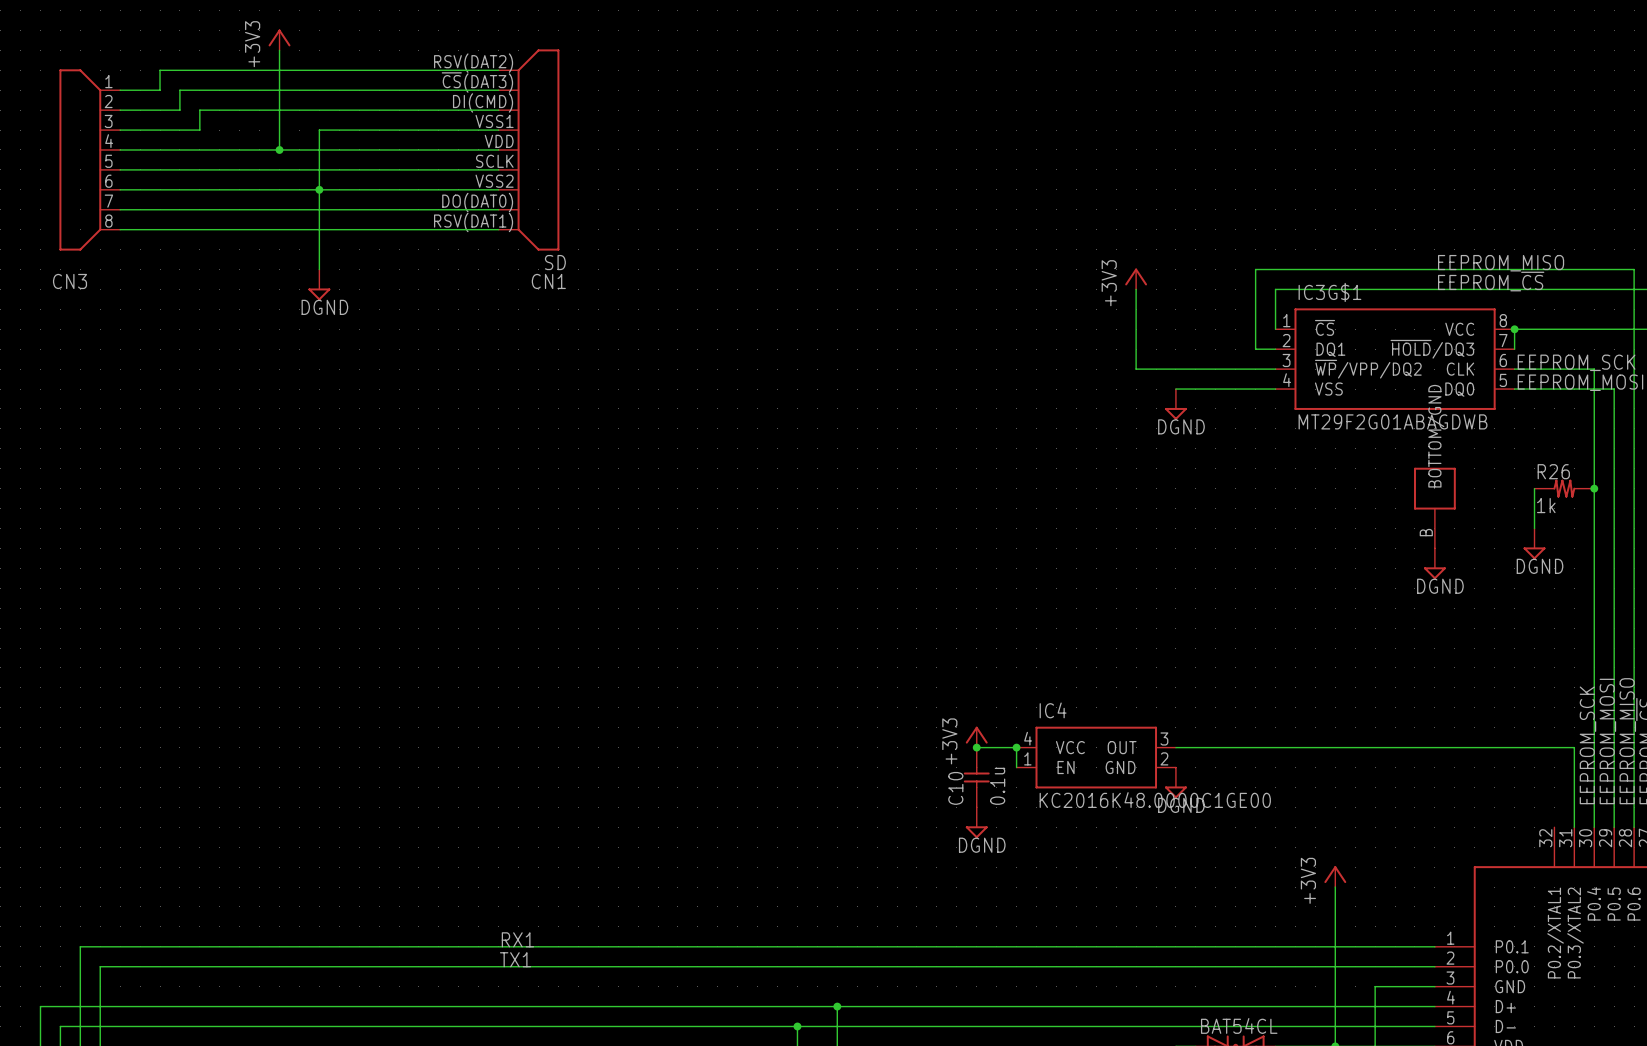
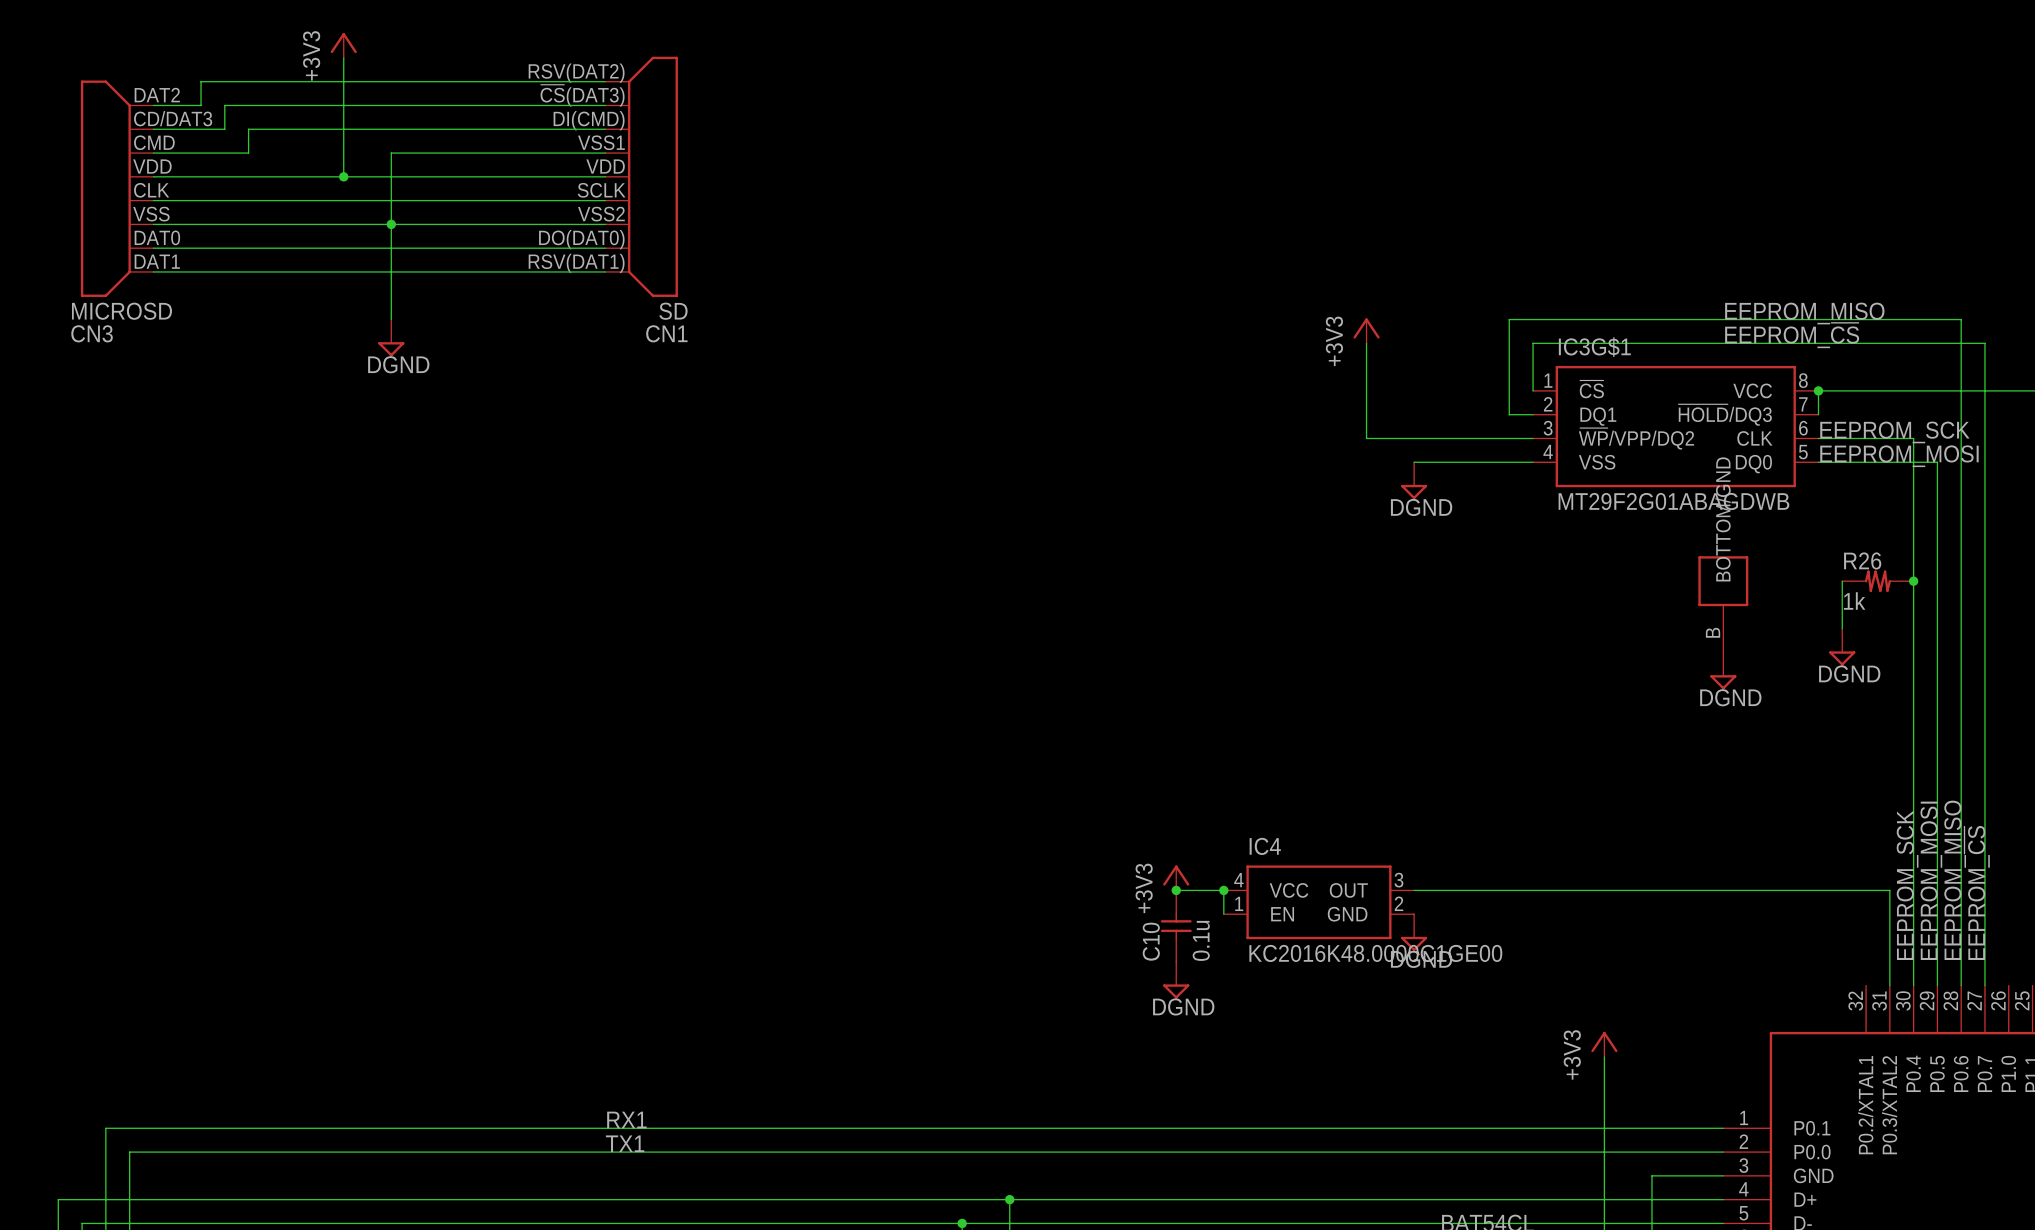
CN3 pin number: 1 (108, 81) -> DAT2 (157, 95)
CN3 pin number: 2 (108, 101) -> CD/DAT3 (173, 118)
CN3 pin number: 3 (108, 121) -> CMD (154, 142)
CN3 pin number: 4 (109, 141) -> VDD (152, 166)
CN3 pin number: 5 (108, 161) -> CLK (151, 190)
CN3 pin number: 6 (108, 181) -> VSS (151, 214)
CN3 pin number: 7 (108, 201) -> DAT0 (157, 237)
CN3 pin number: 8 (108, 221) -> DAT1 (157, 261)
CN3 value: none -> MICROSD (121, 311)

